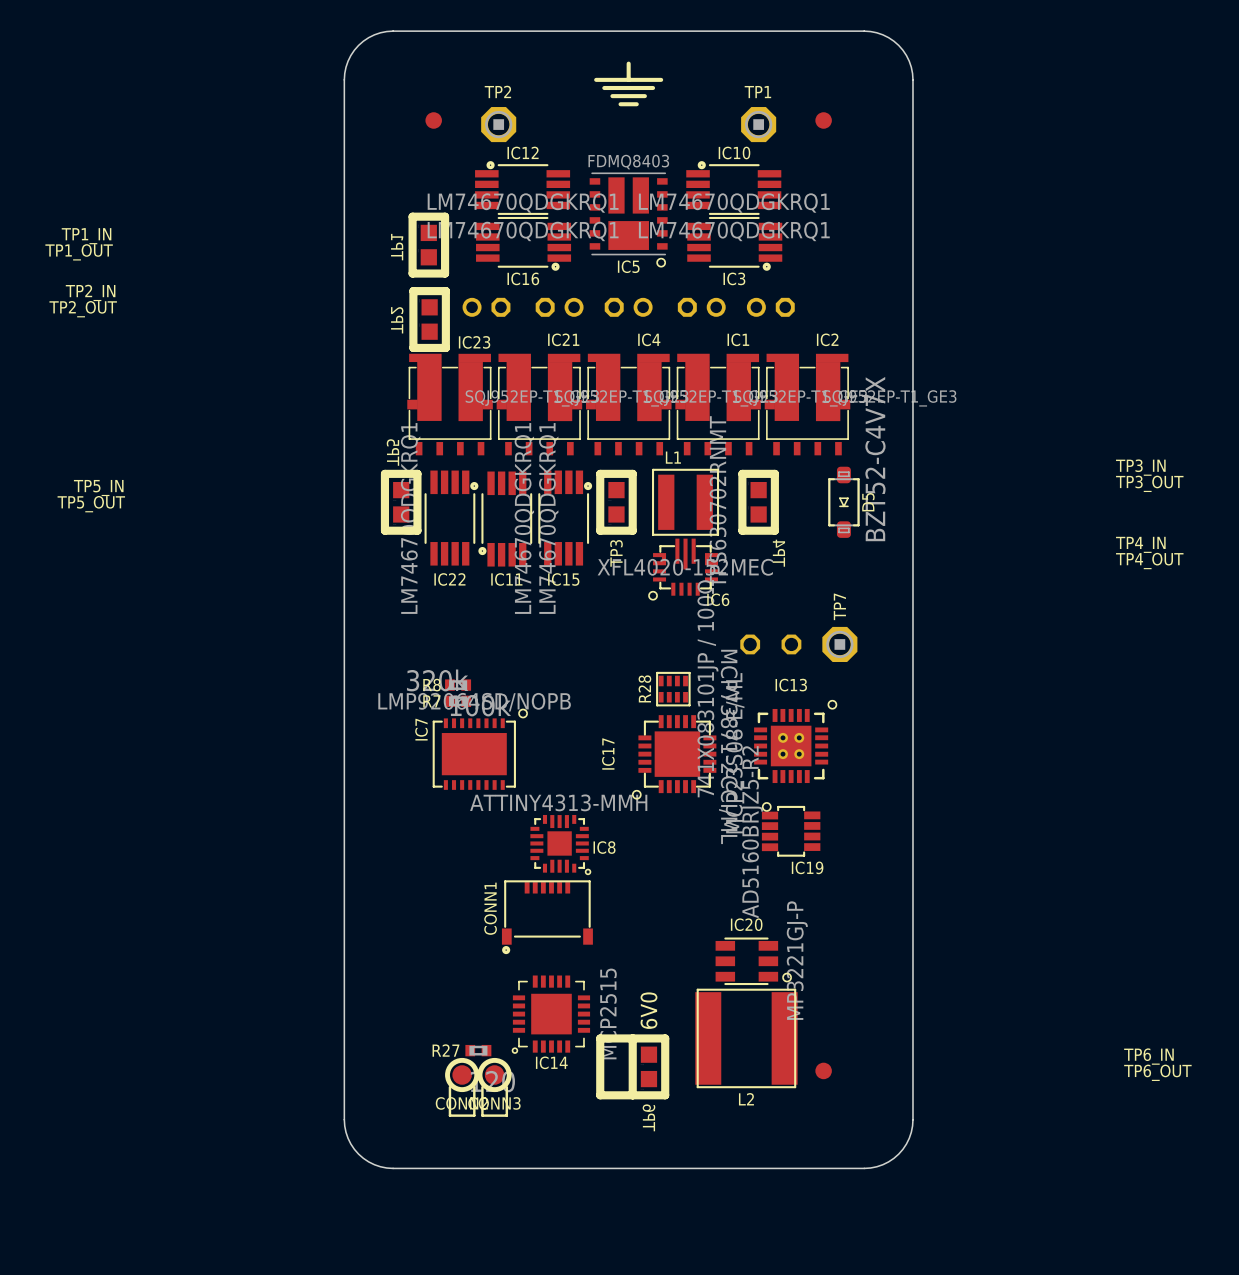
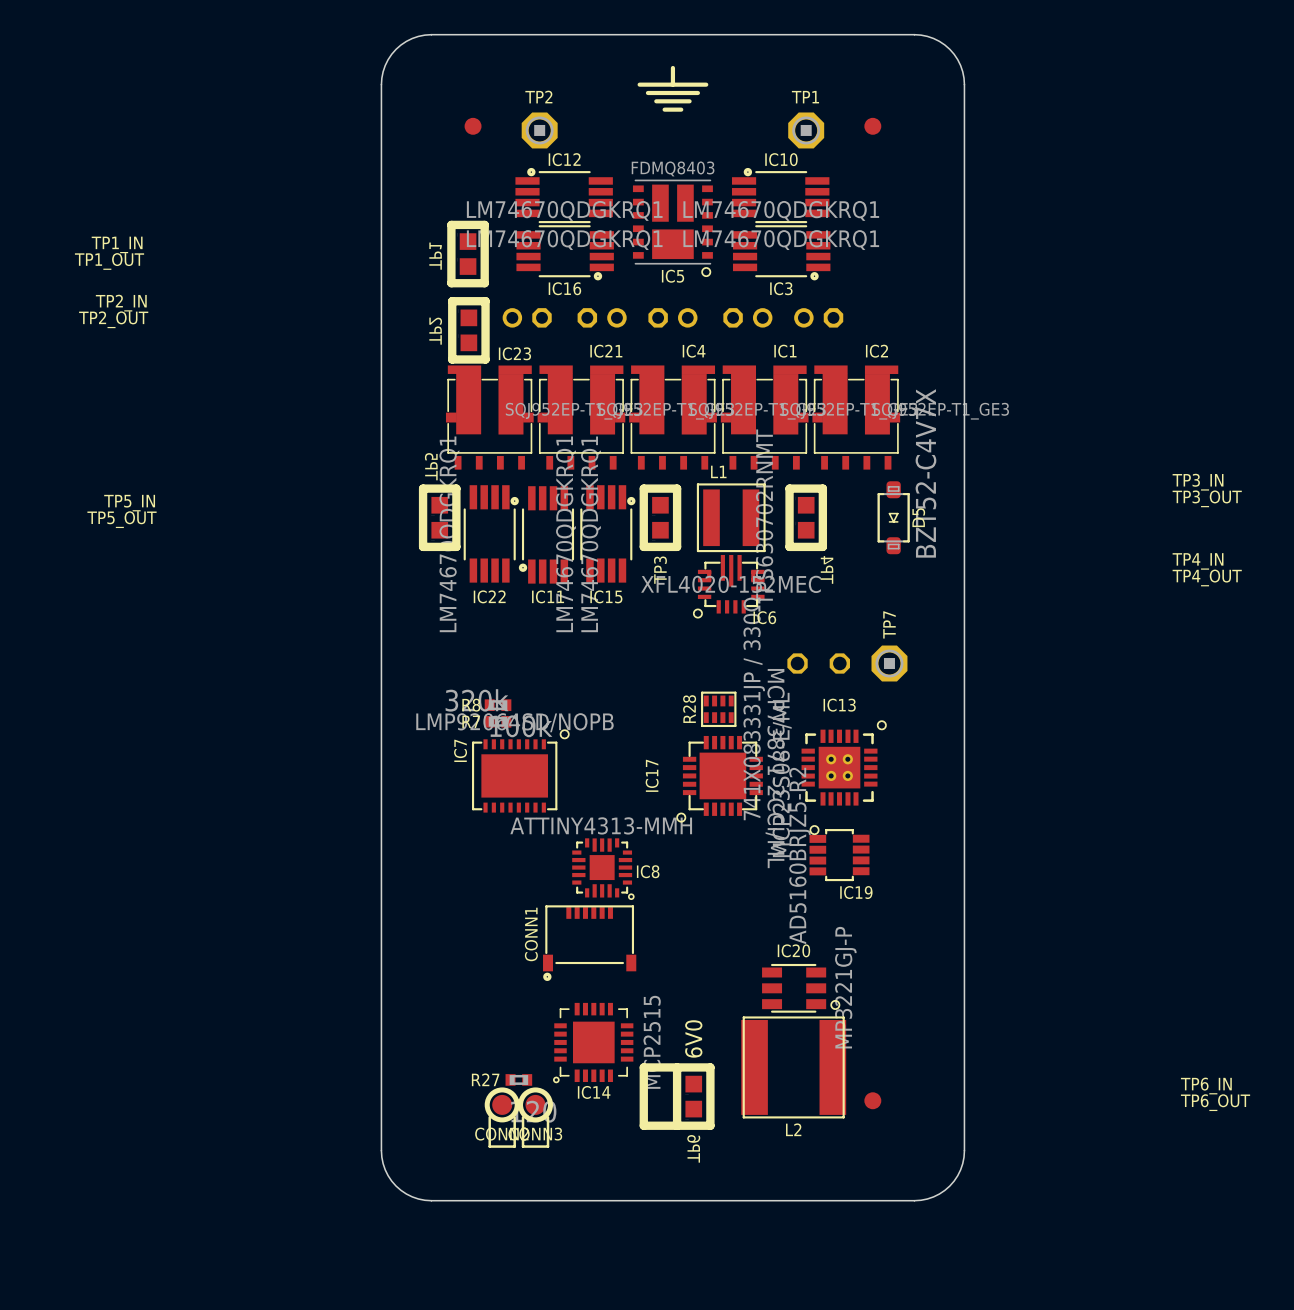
R28 value: 741X083101JP / 100Ω (707, 688) -> 741X083331JP / 330Ω (754, 708)

